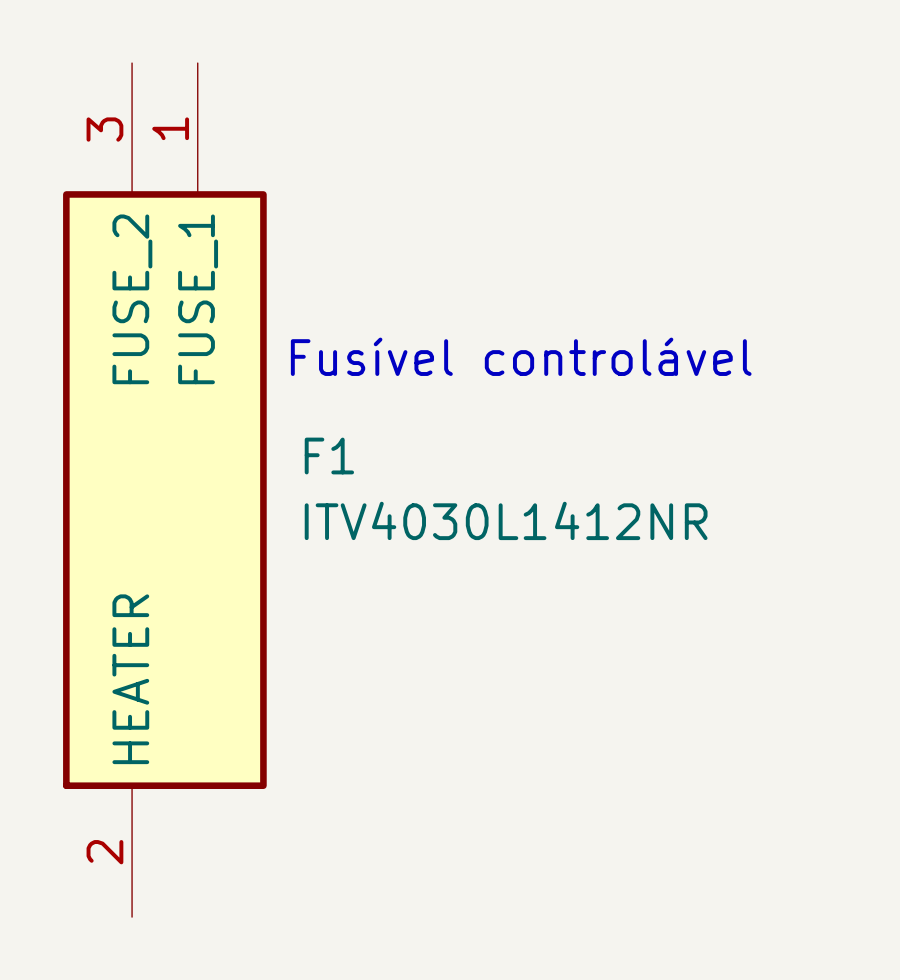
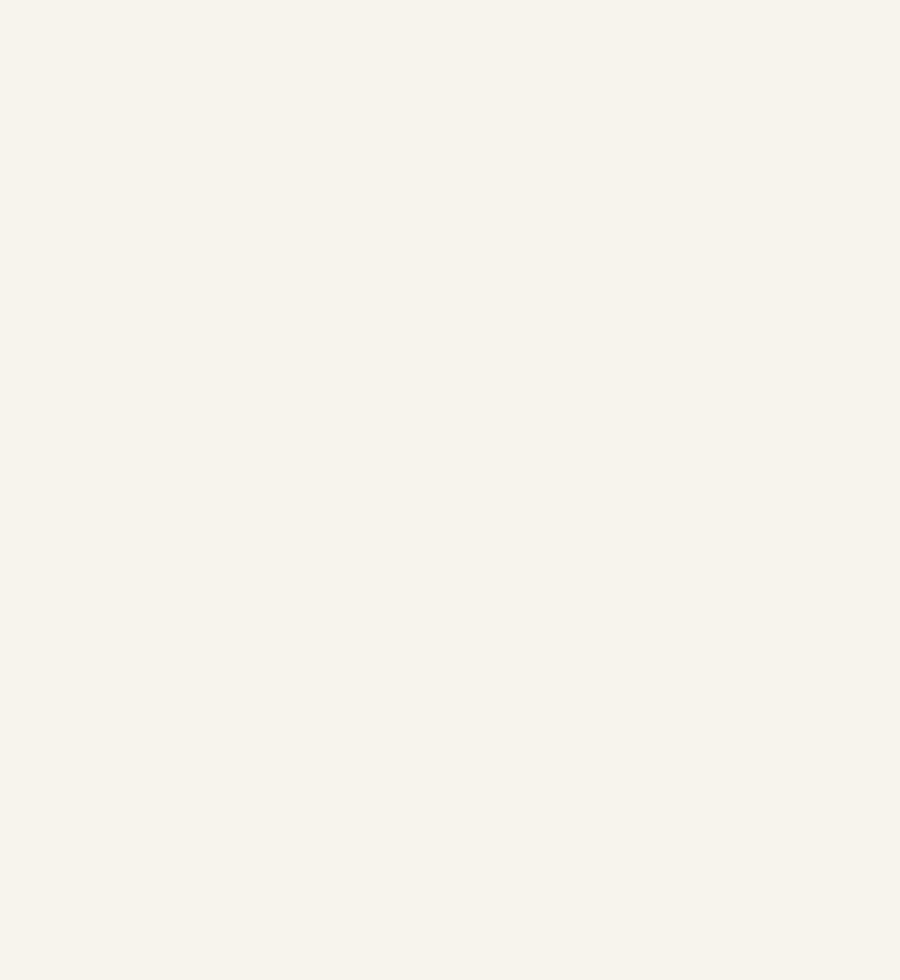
text: Fusível controlável (521, 356) -> none
F1: ITV4030L1412NR (164, 490) -> none

